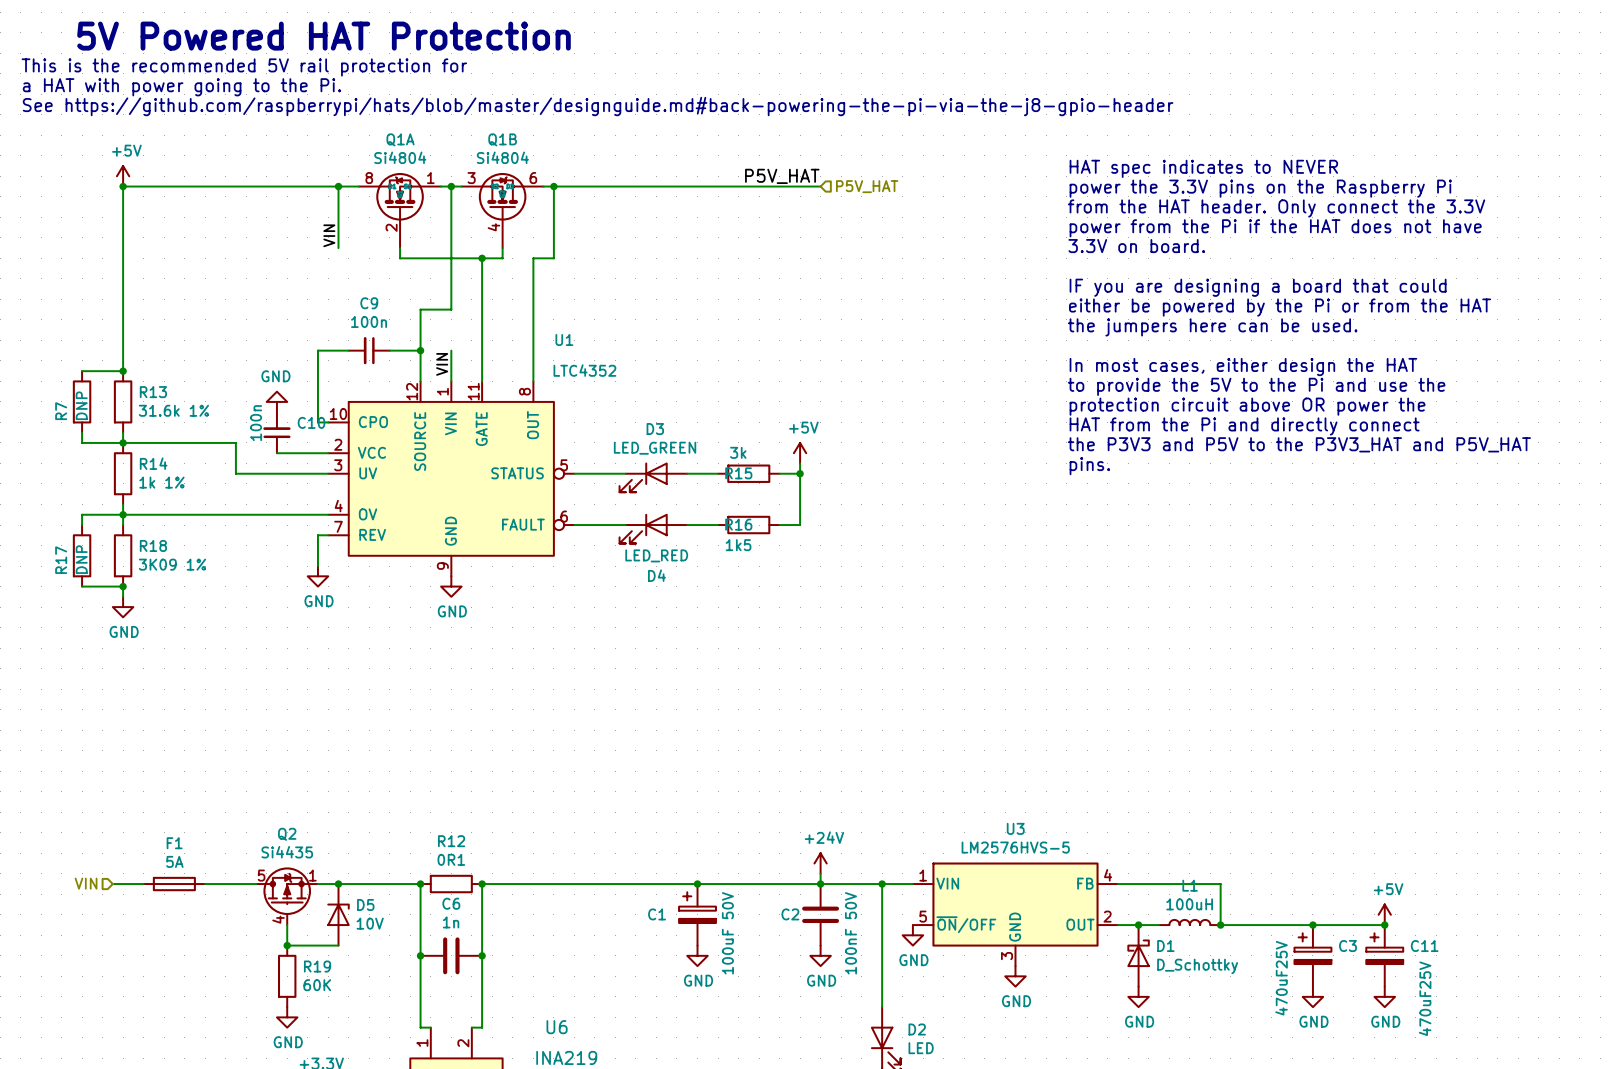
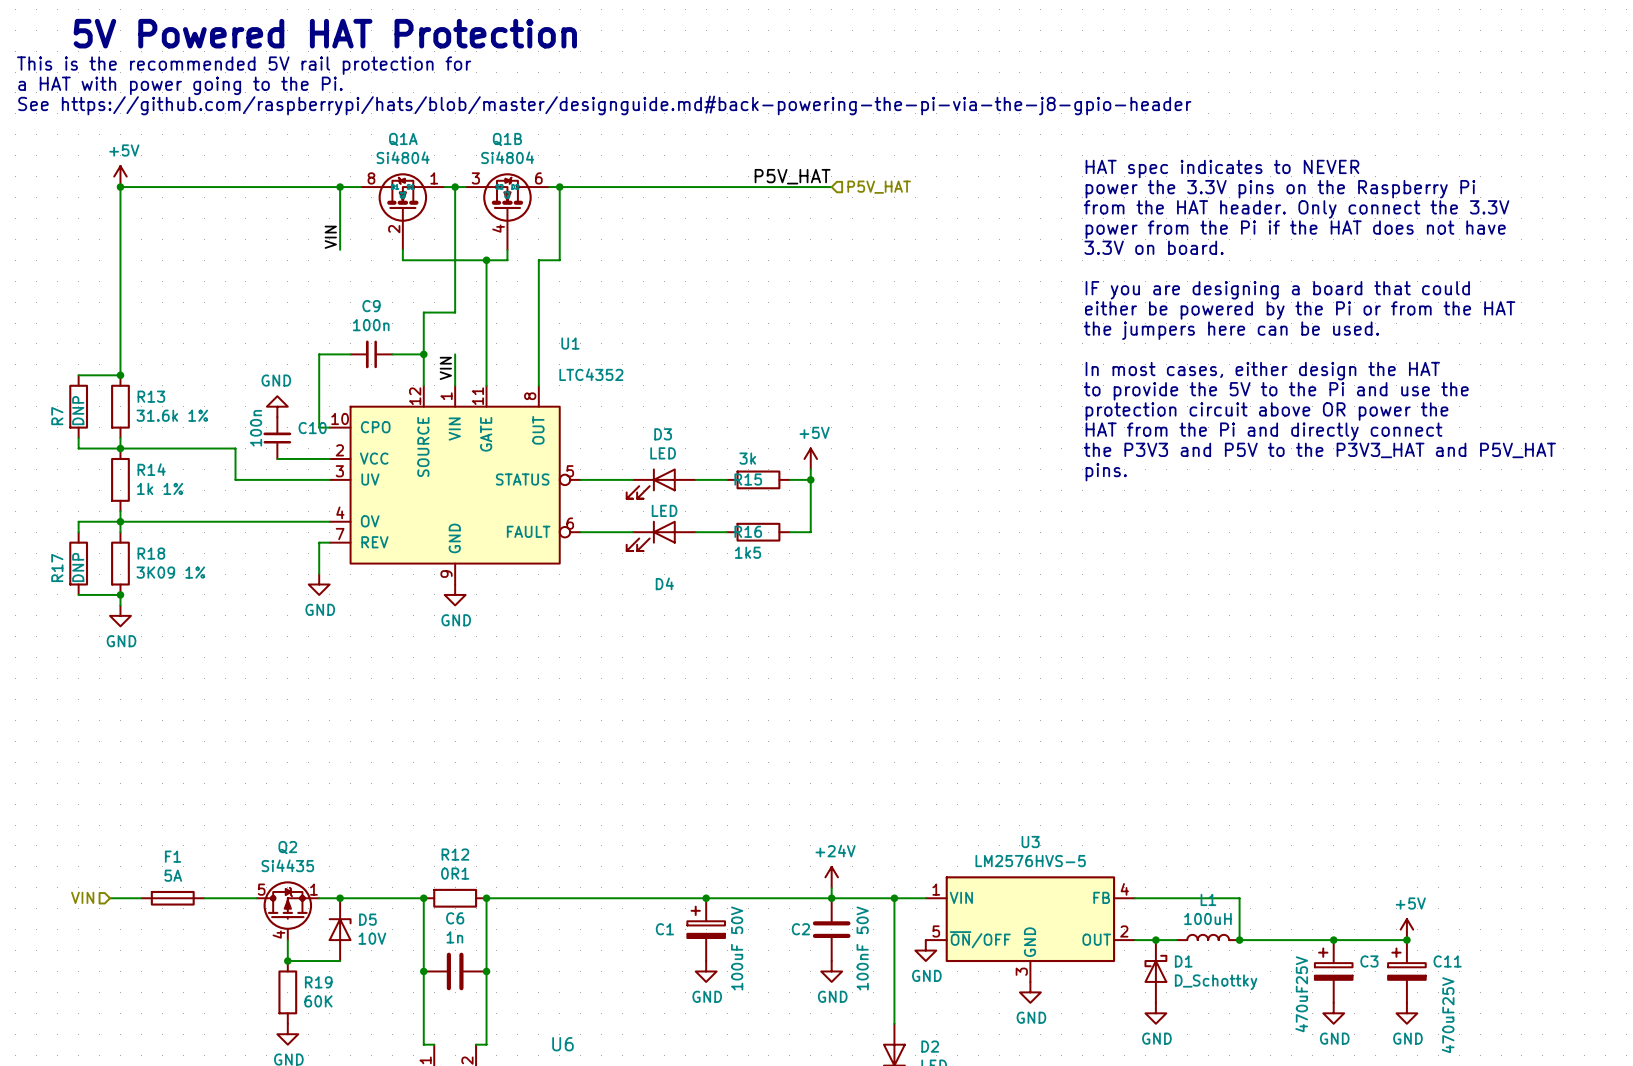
D3 value: LED_GREEN (655, 448) -> LED (663, 453)
D4 value: LED_RED (656, 555) -> LED (664, 510)

